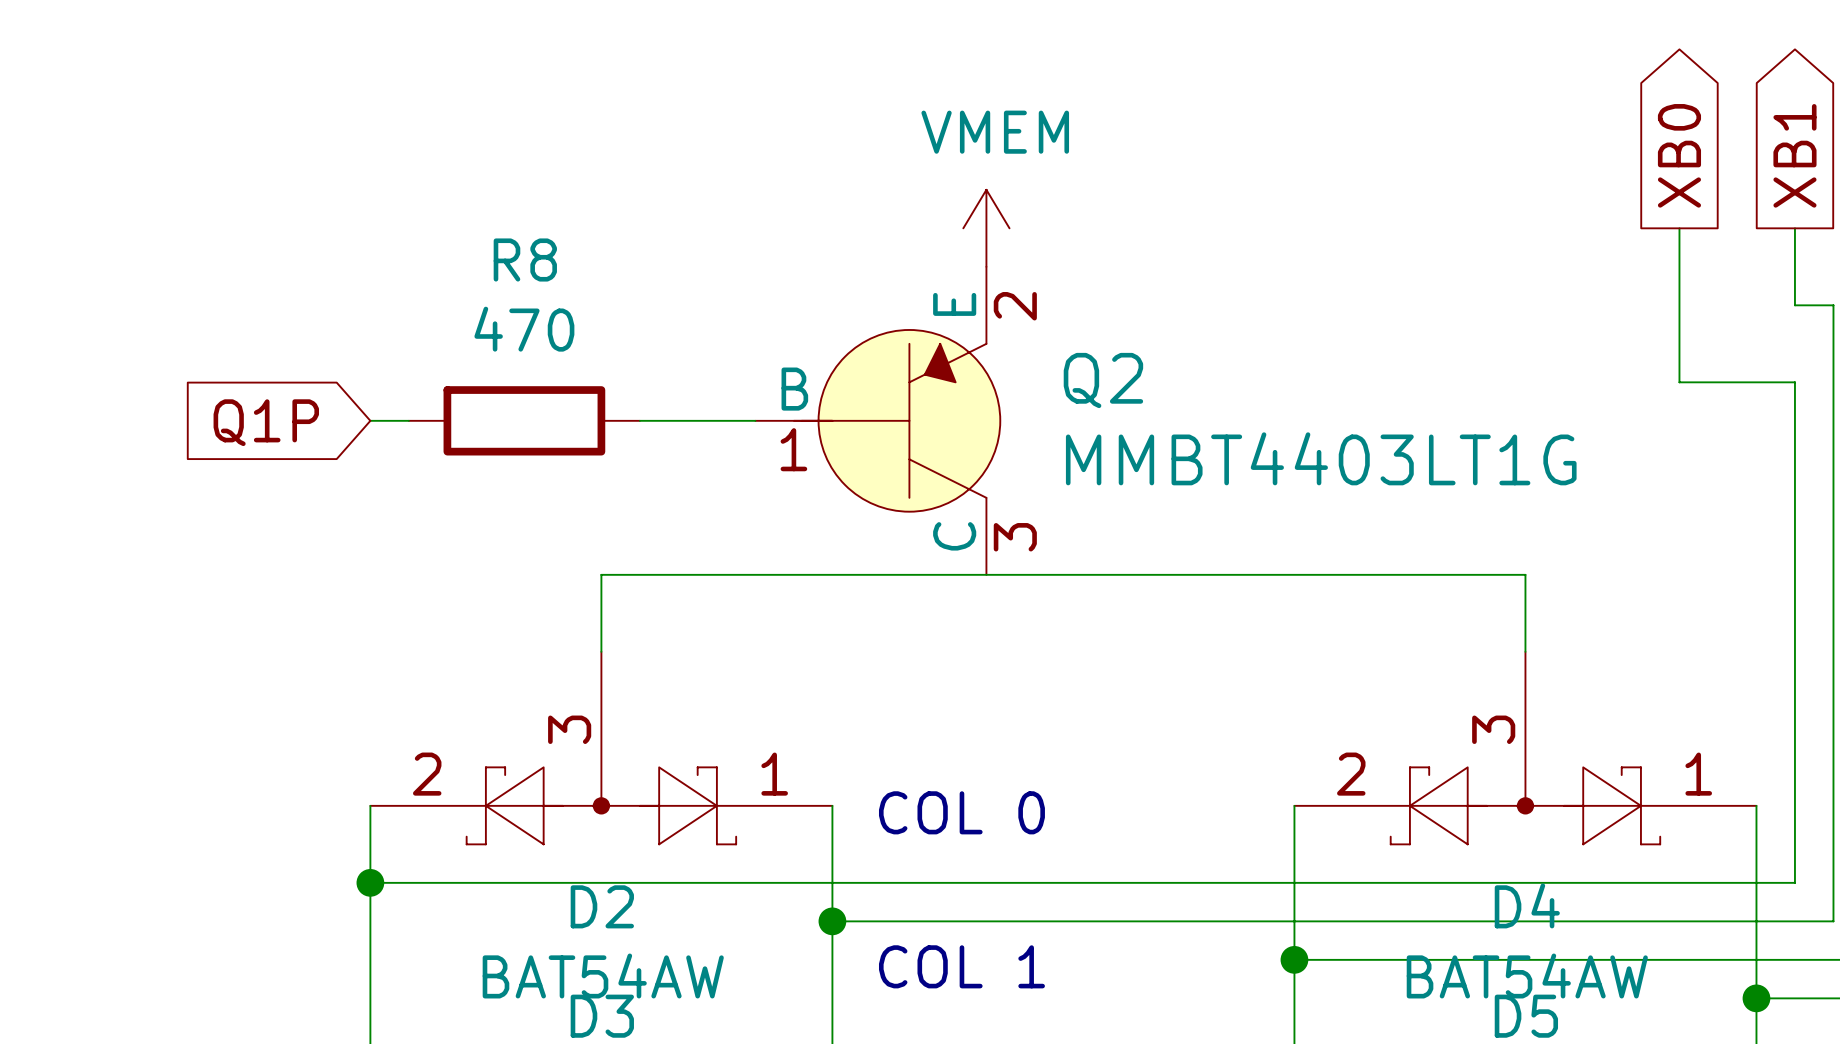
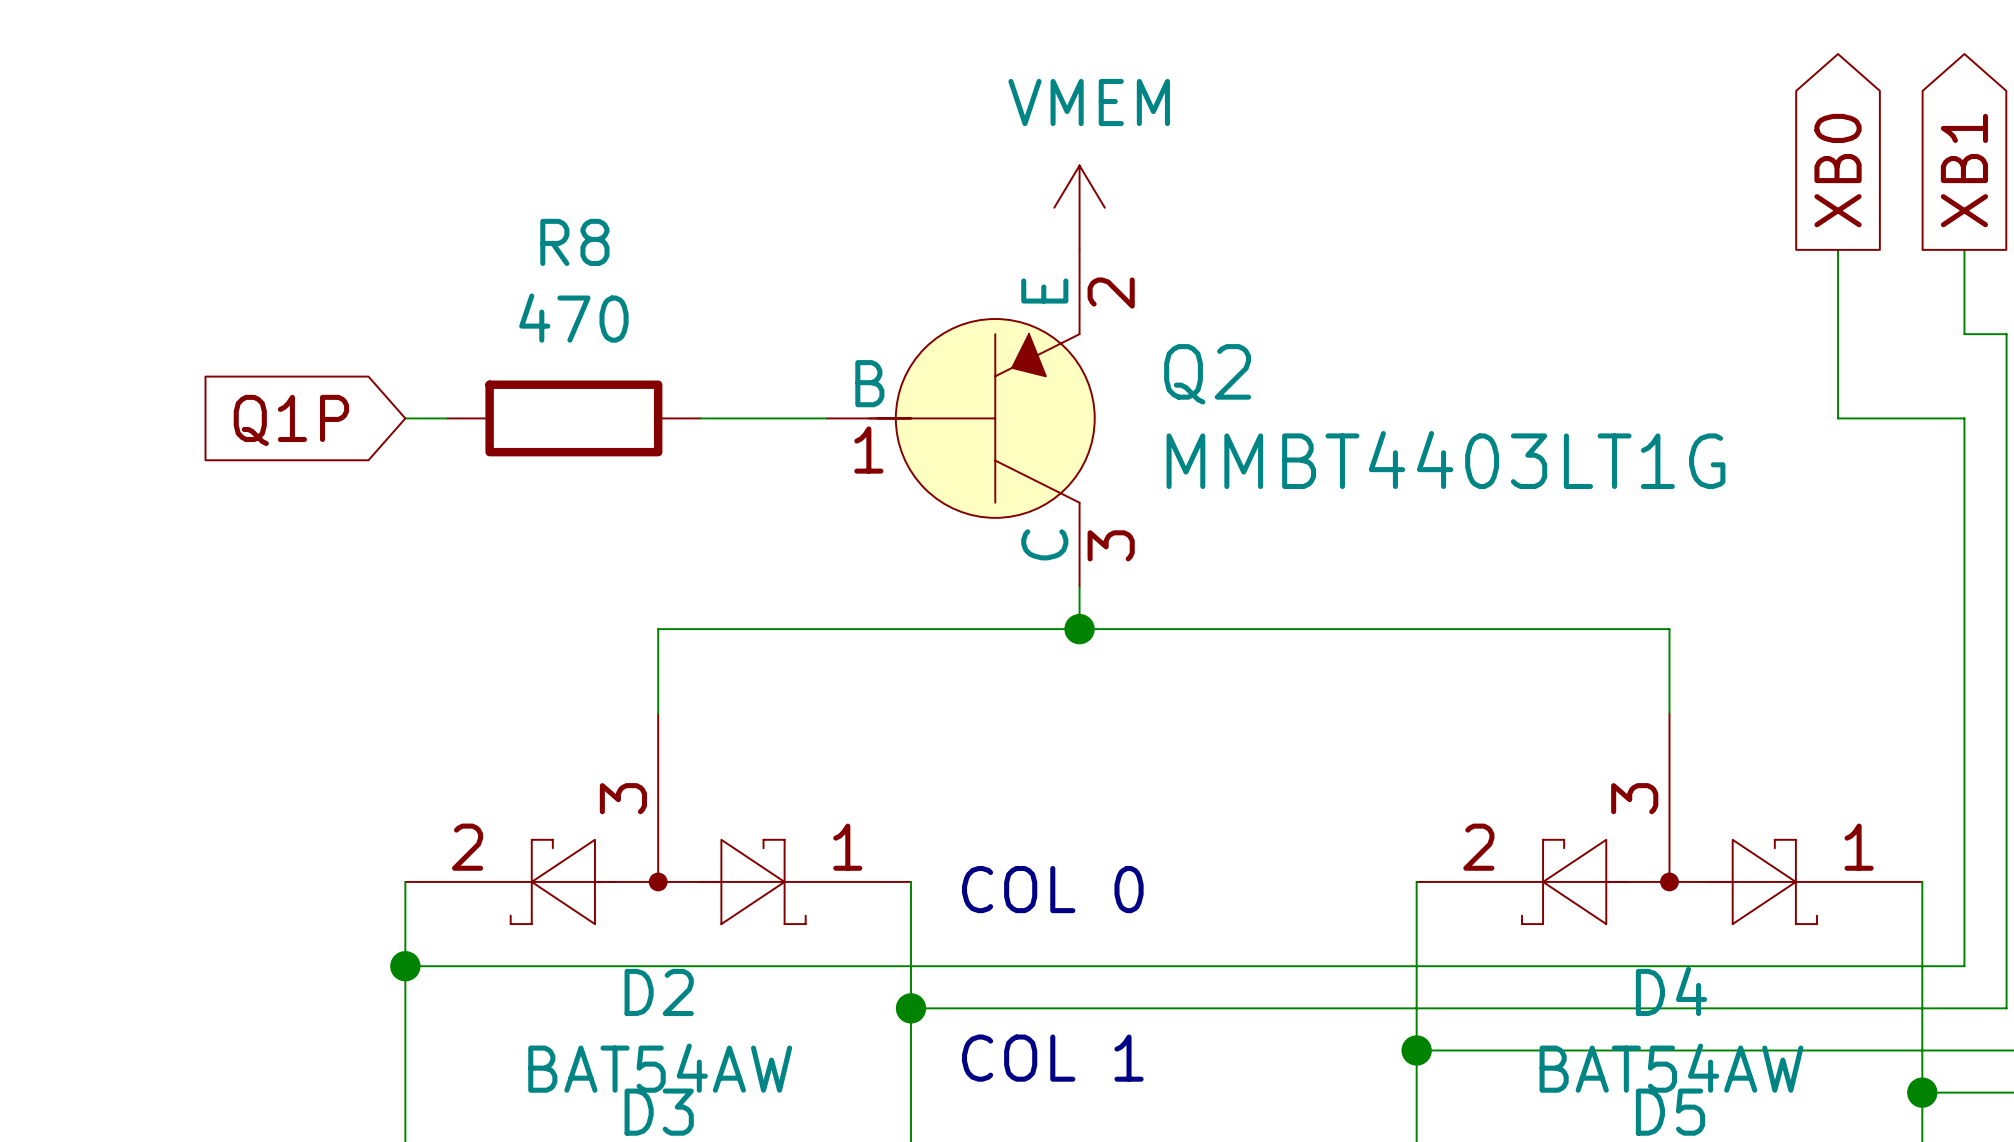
power symbol position: VMEM (986, 228) -> VMEM (1079, 207)
wire: (370, 420) (408, 420) -> (405, 418) (447, 418)
R8 position: (524, 420) -> (573, 418)
wire: (639, 420) (755, 420) -> (700, 418) (826, 418)
Q2 position: (877, 420) -> (960, 418)
global label position: Q1P (266, 422) -> Q1P (291, 420)
junction: none -> (1079, 629)

